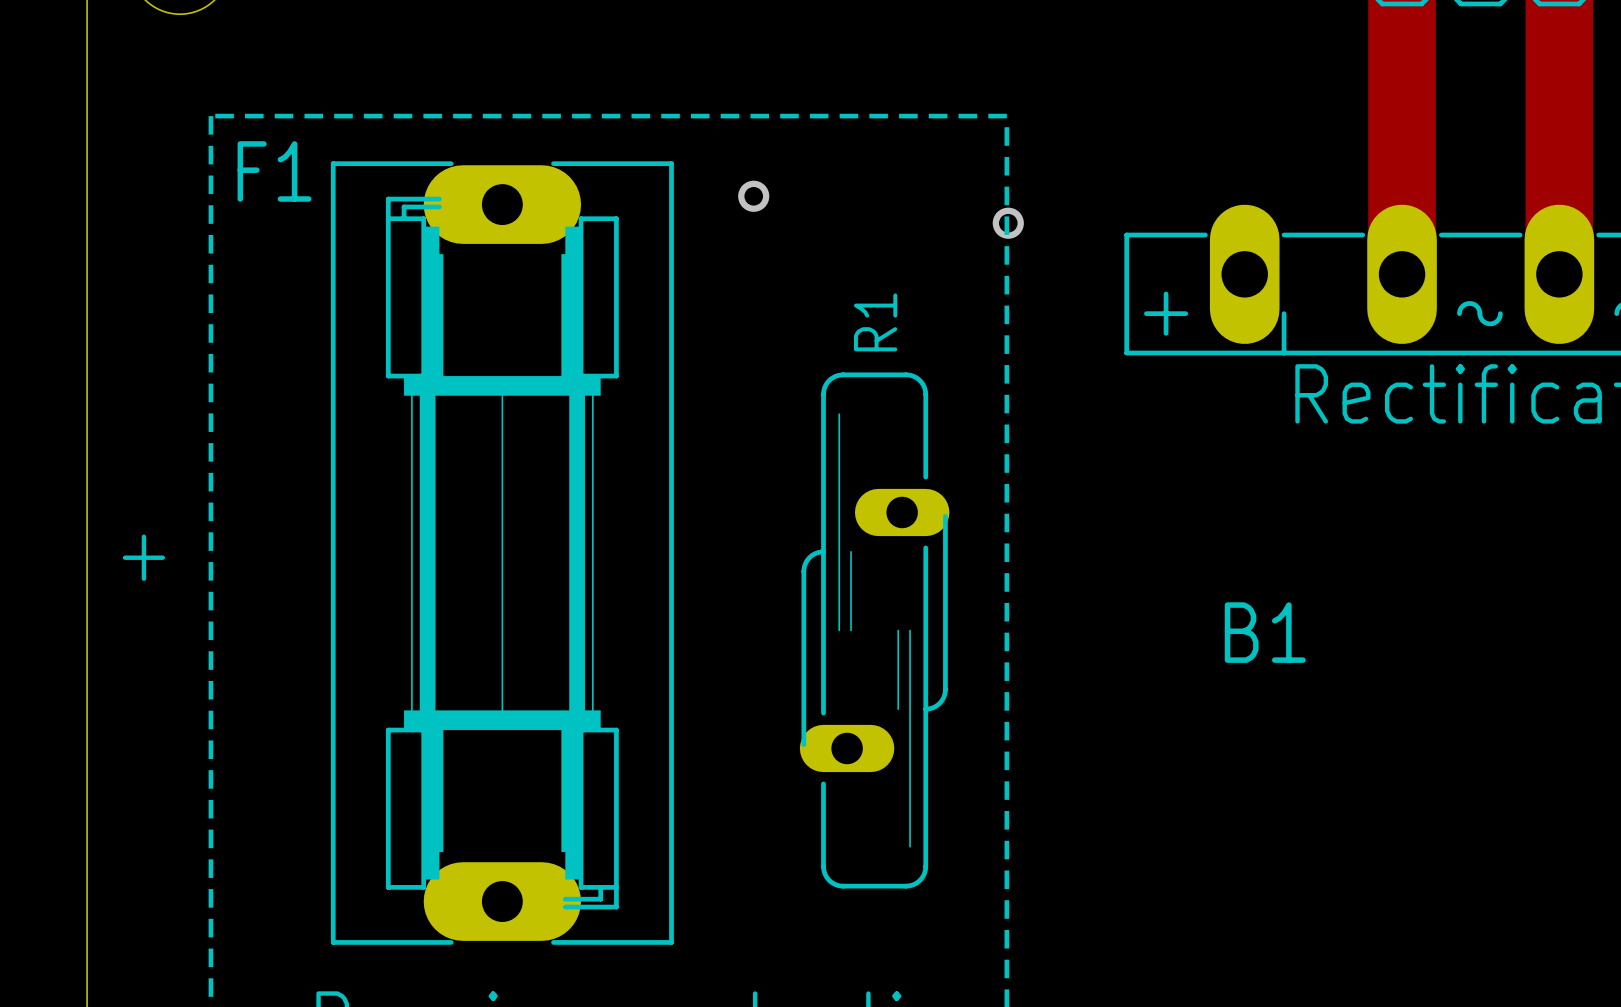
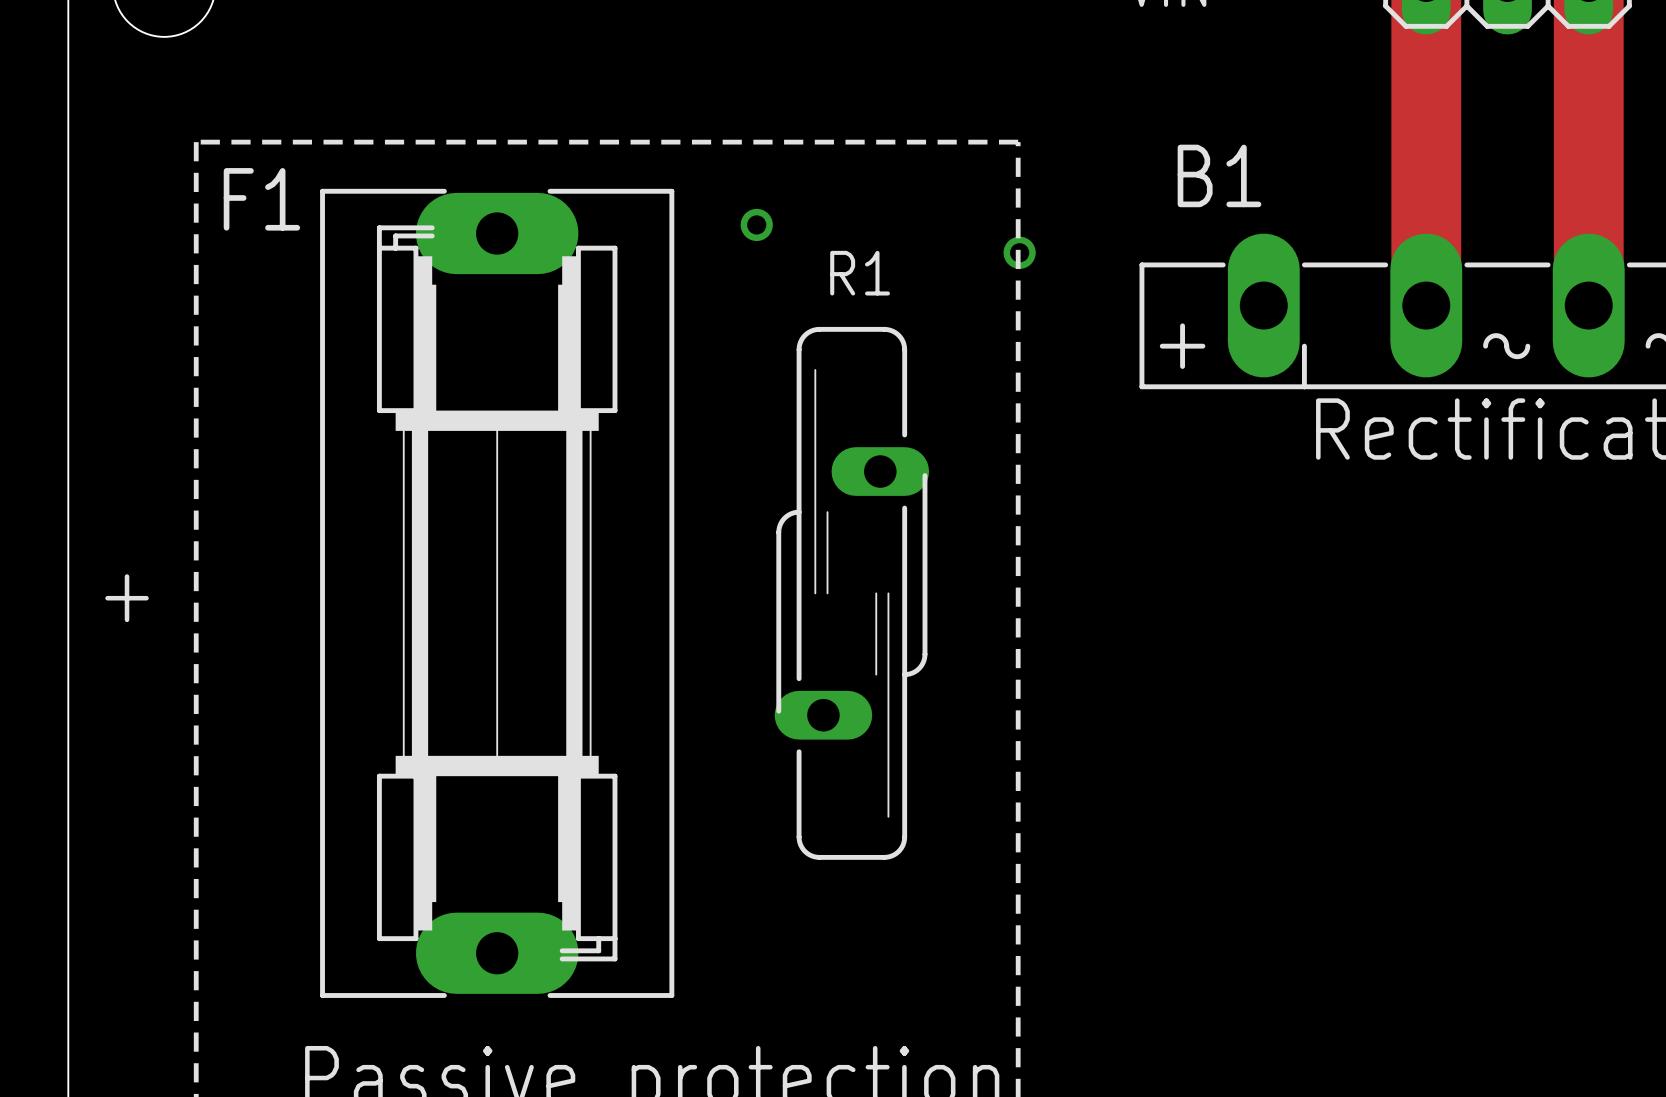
R1 name rotation: 0° (875, 322) -> 90° clockwise (860, 273)
R1 position: (874, 630) -> (851, 593)
B1 name position: B1 (1265, 632) -> B1 (1219, 175)

